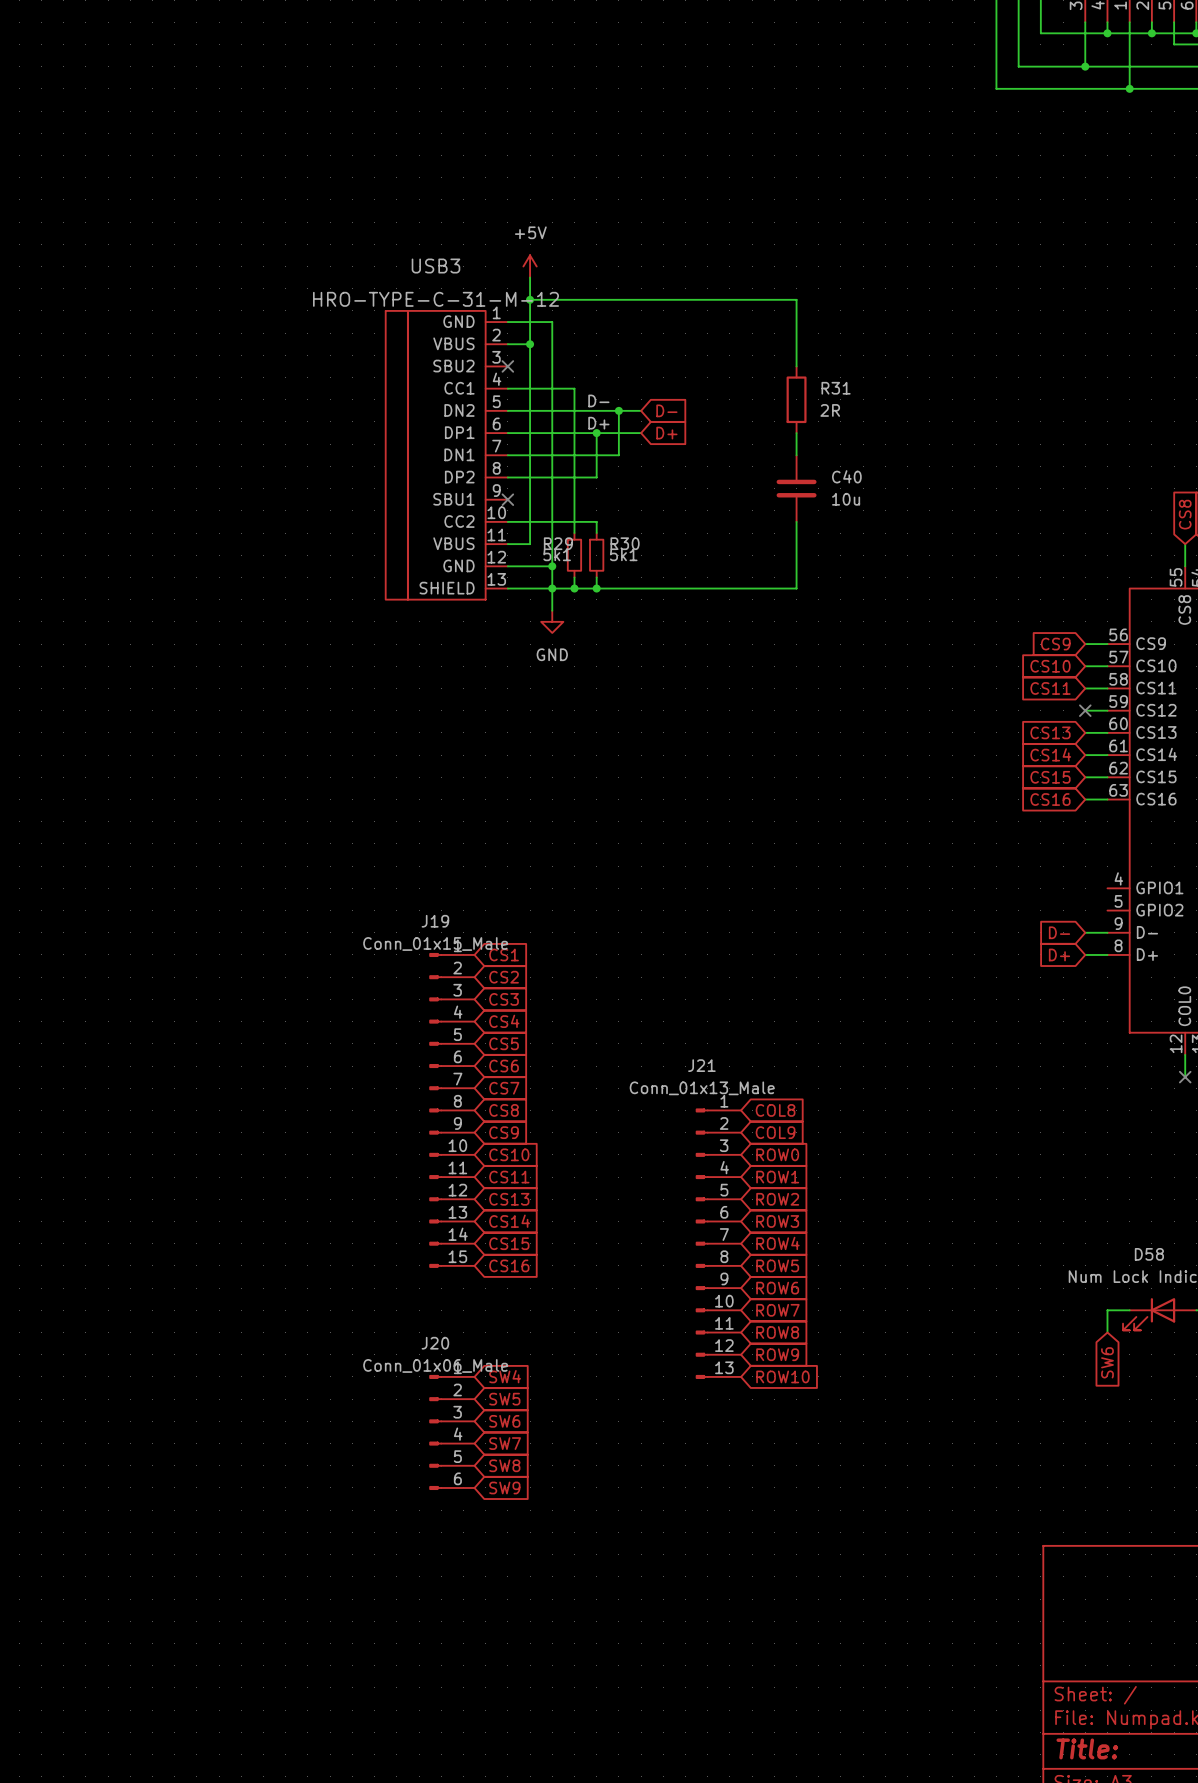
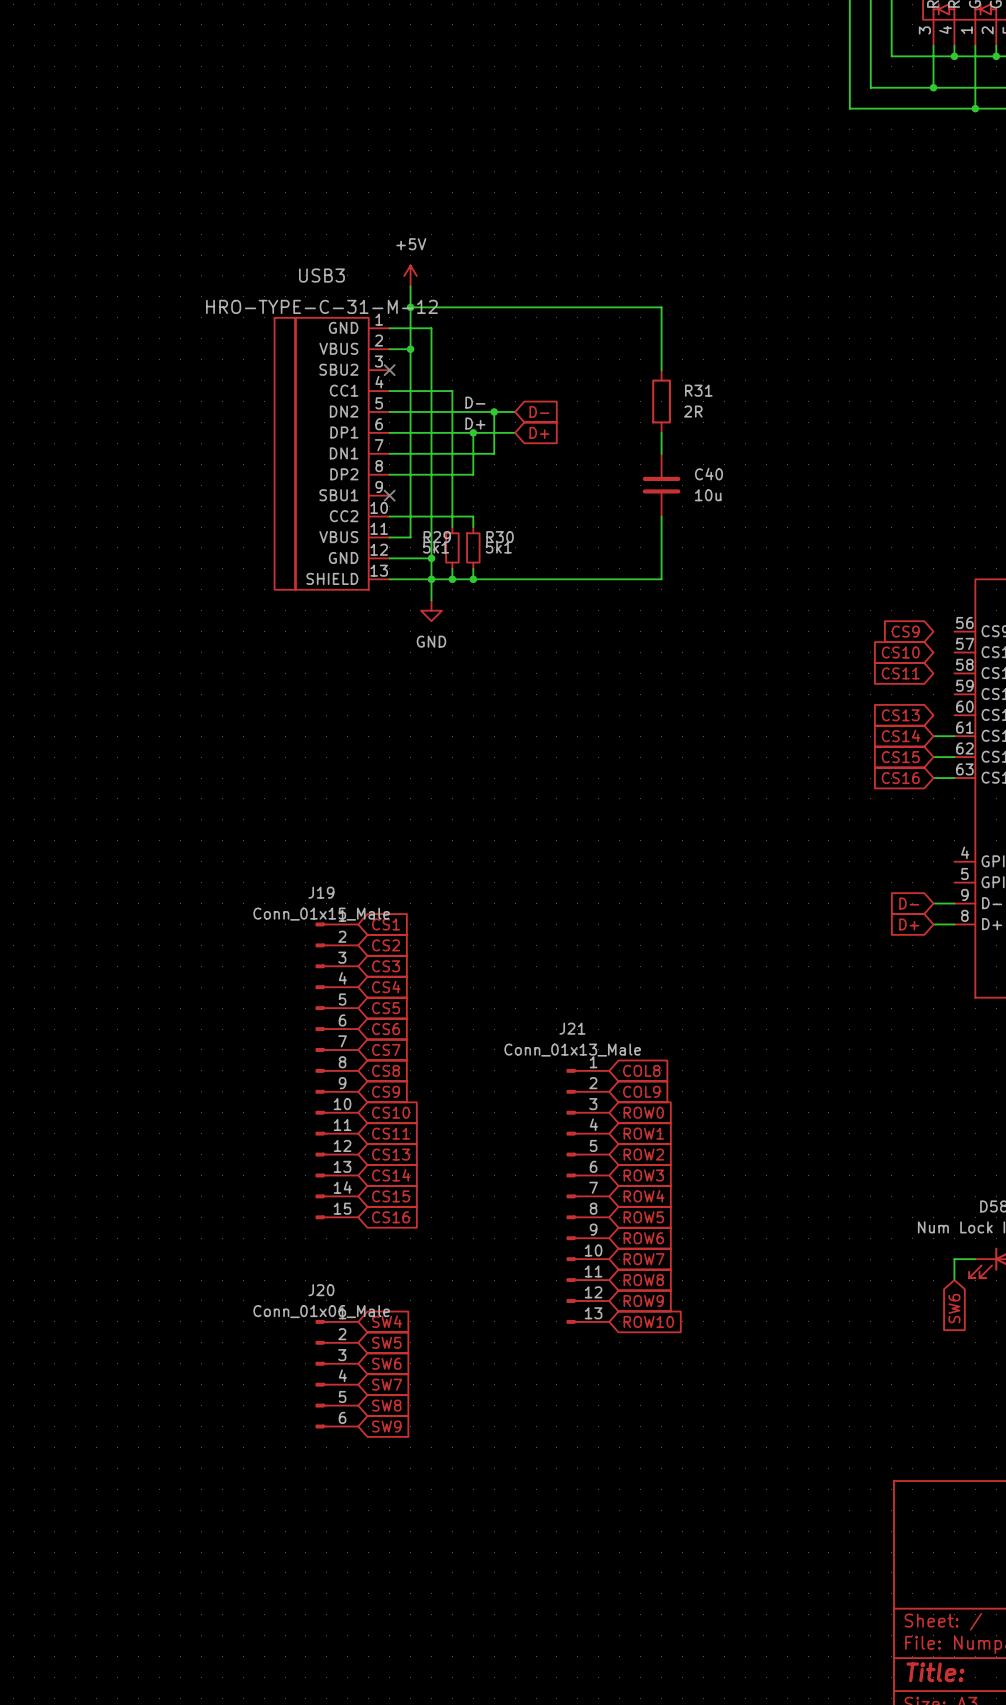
wire: (1085, 644) (1107, 644) -> none
wire: (1085, 666) (1107, 666) -> none
wire: (1085, 688) (1107, 688) -> none
wire: (1085, 710) (1107, 710) -> none
no-connect mark: (1085, 710) -> none
wire: (1085, 732) (1107, 732) -> none

